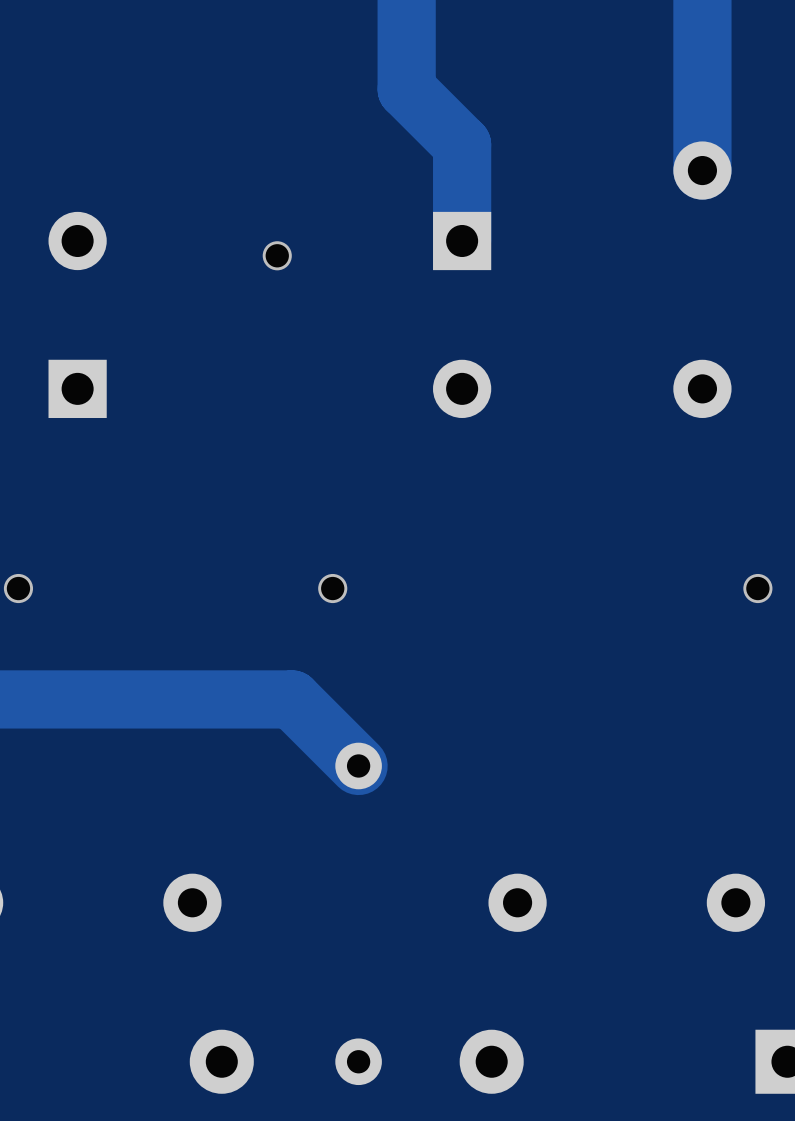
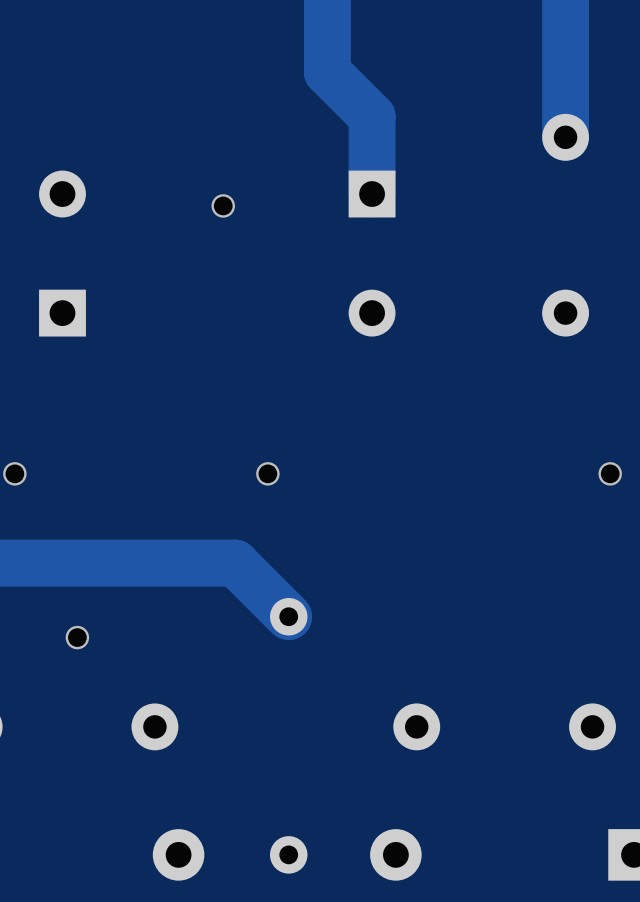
via: none -> (77, 637)

